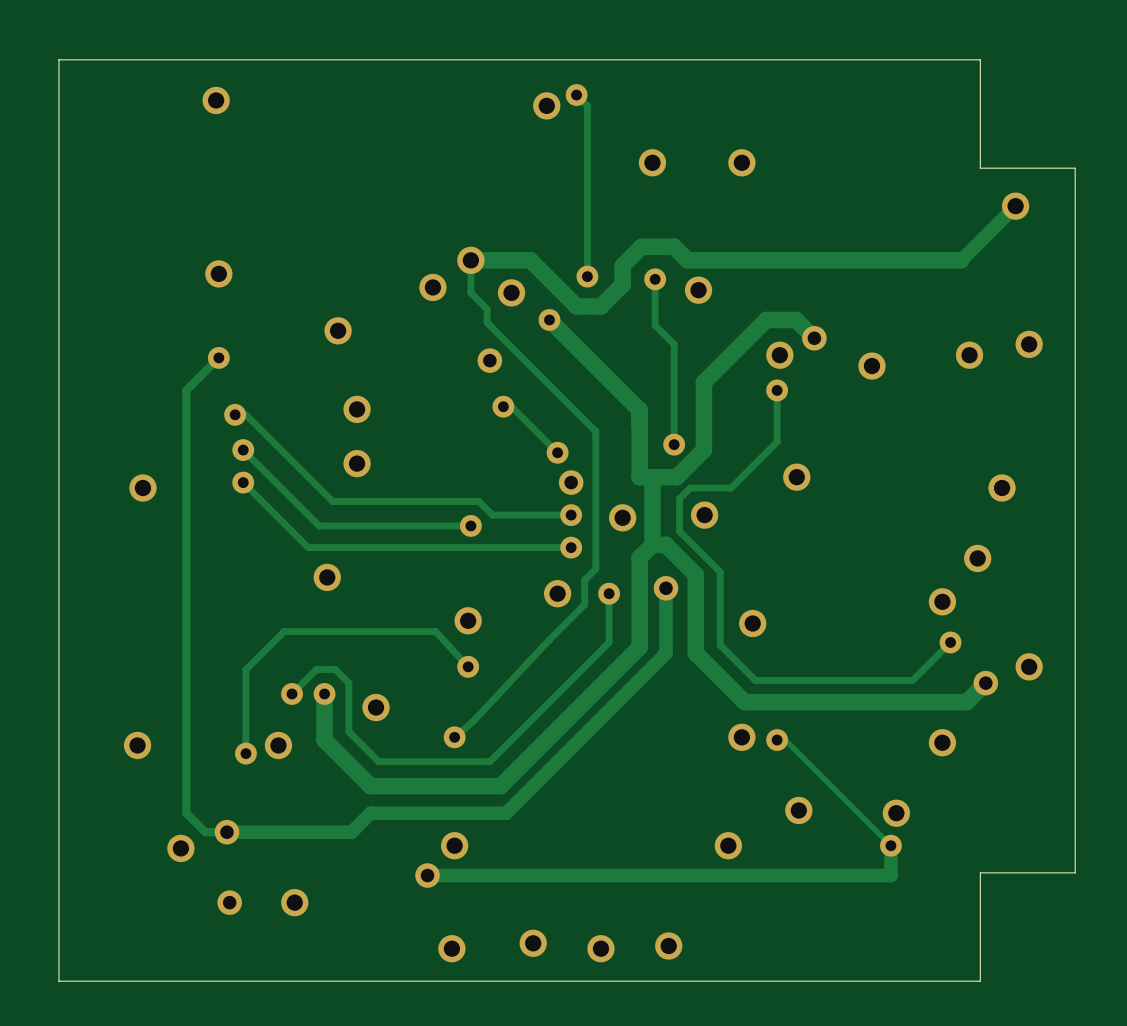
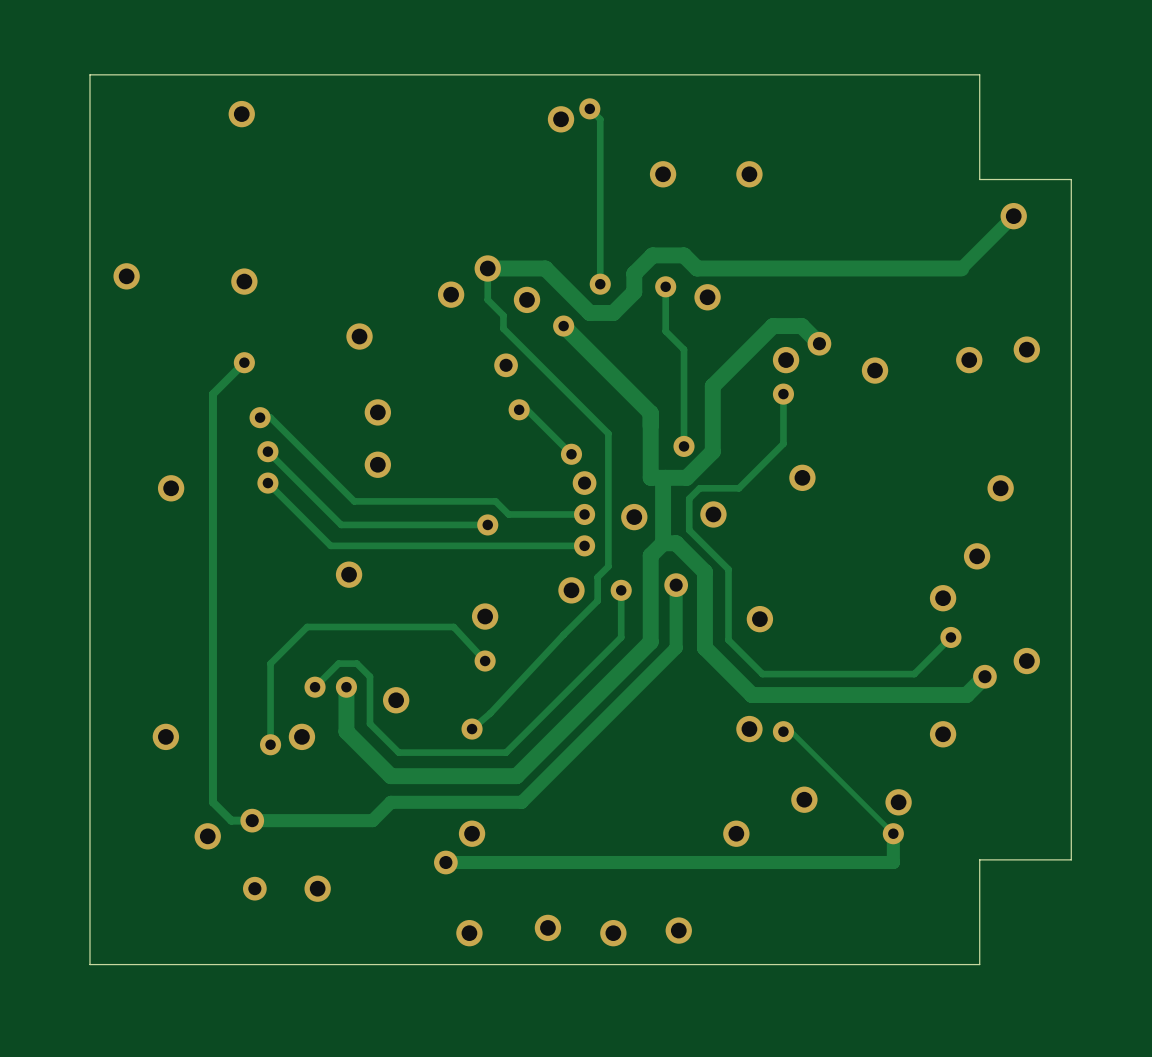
via: none -> (126, 276)

